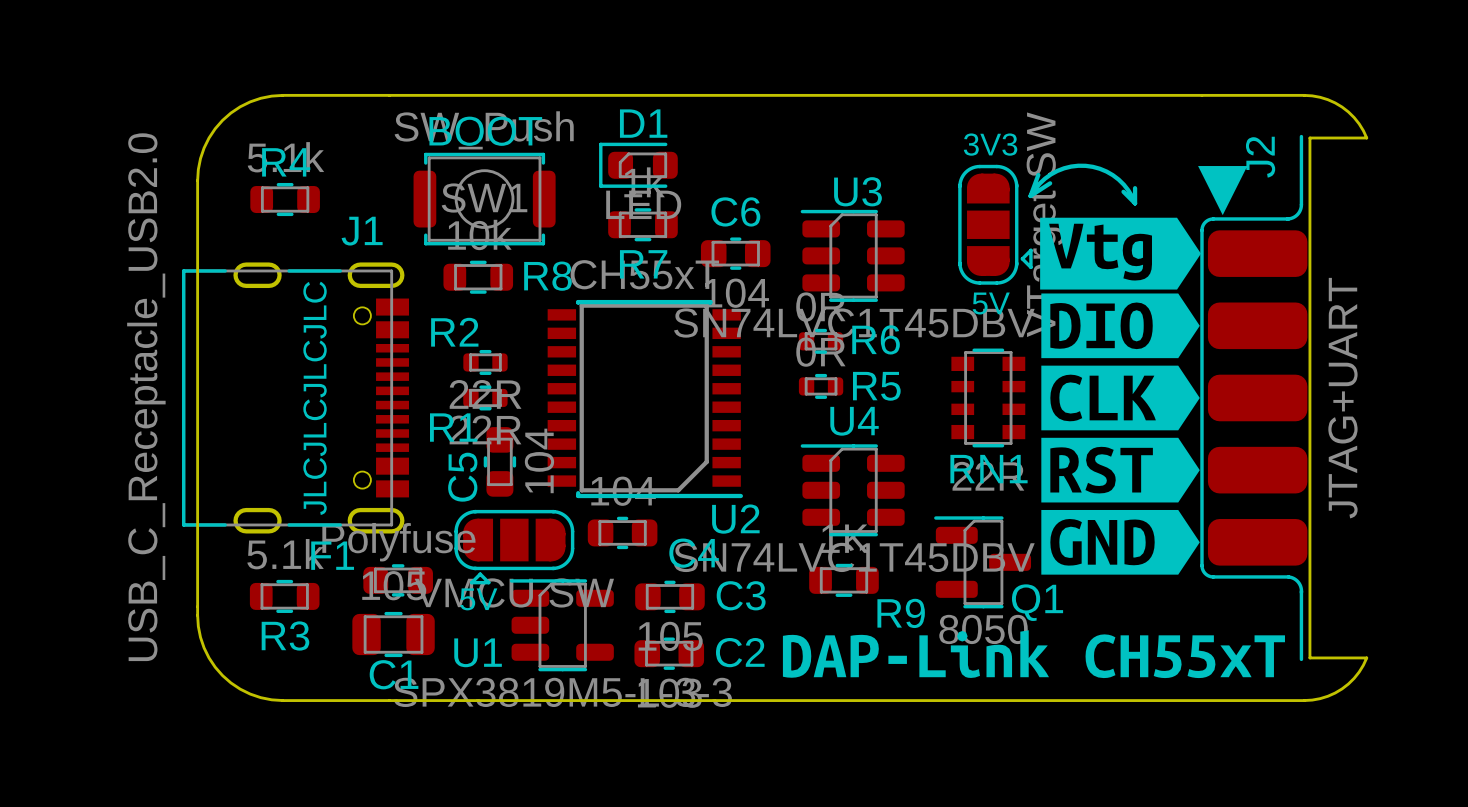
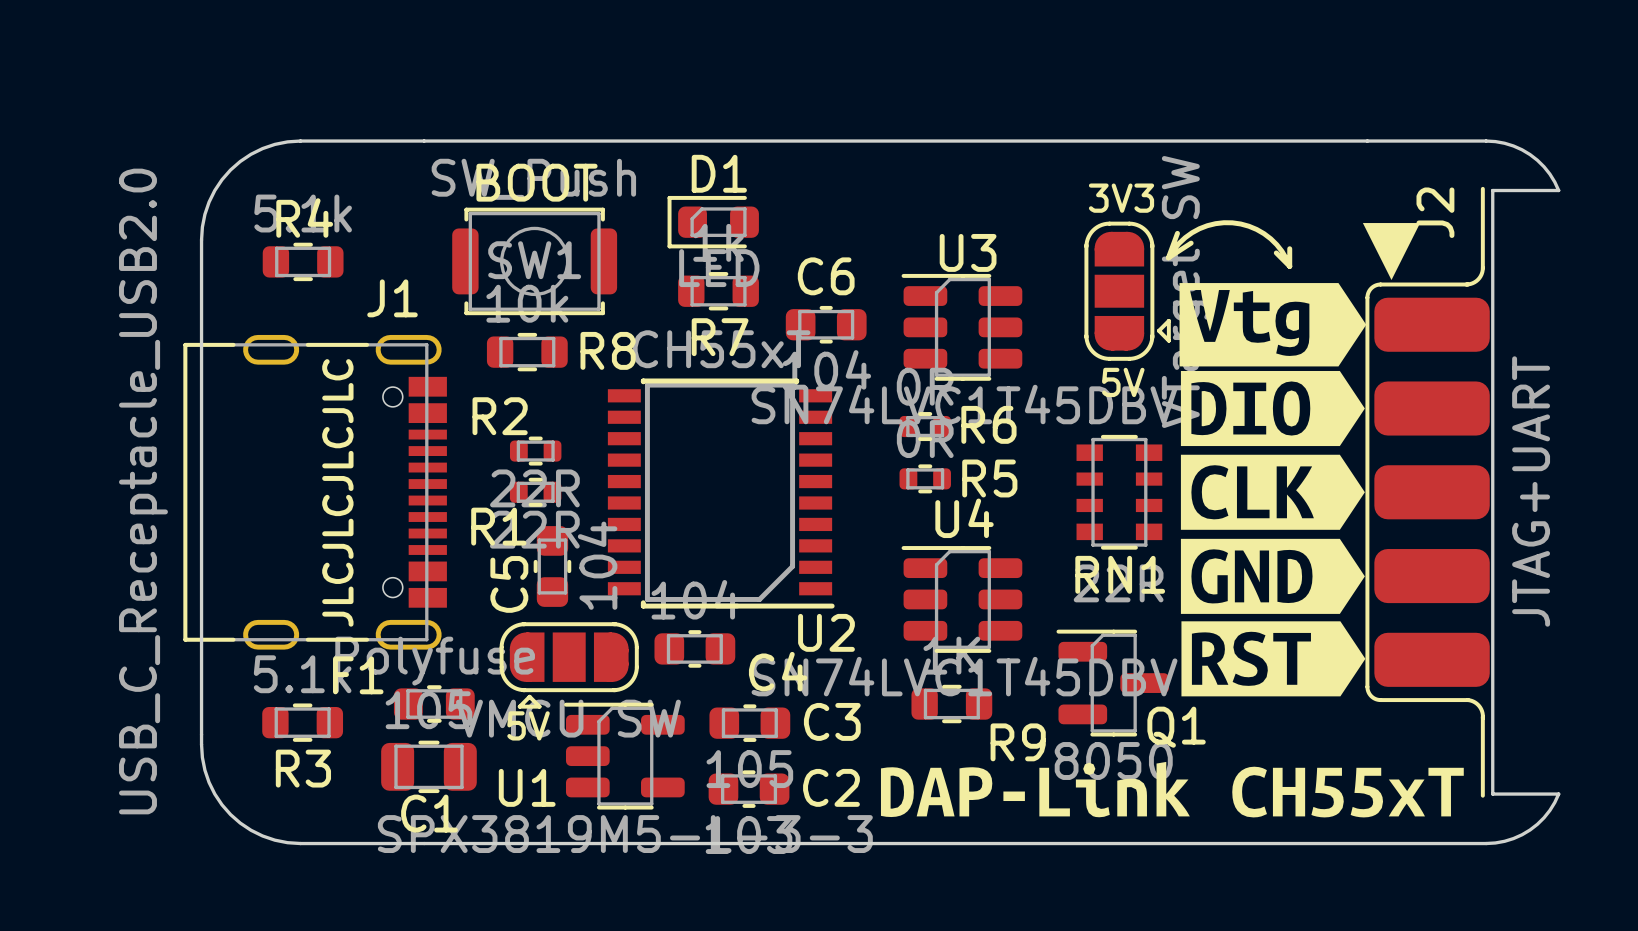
drawing position: (1120, 470) -> (1273, 658)
drawing position: (1120, 542) -> (1272, 576)

